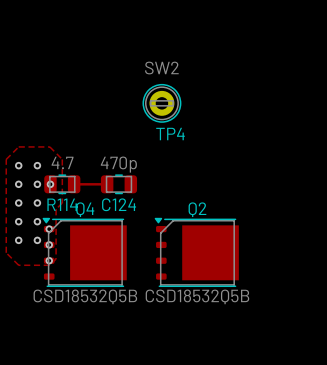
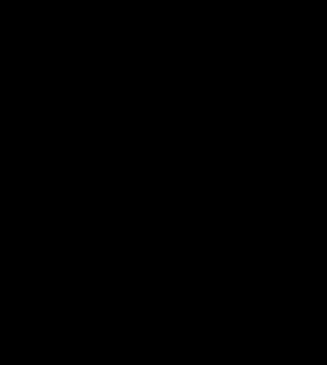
TP4: SW2 (161, 103) -> none
zone outline: (18, 146) (6, 159) (6, 252) (18, 265) (49, 265) (56, 259) (56, 209) (62, 203) (62, 159) (49, 146) (18, 146) -> none
via: (18, 165) -> none
via: (37, 165) -> none
via: (18, 184) -> none
via: (37, 184) -> none
via: (50, 184) -> none
R114: 4.7 (62, 184) -> none
track: (74, 184) (107, 184) -> none
C124: 470p (118, 184) -> none
via: (18, 203) -> none
via: (37, 203) -> none
via: (18, 221) -> none
via: (37, 221) -> none
via: (49, 229) -> none
via: (18, 240) -> none
via: (37, 240) -> none
via: (49, 244) -> none
Q4: CSD18532Q5B (84, 252) -> none
Q2: CSD18532Q5B (196, 252) -> none
via: (49, 260) -> none

